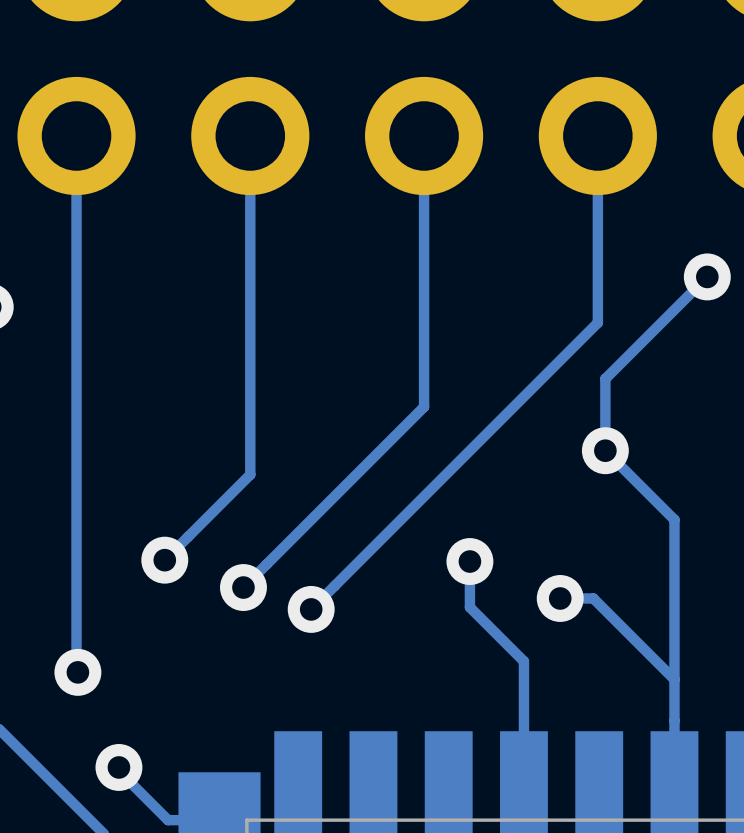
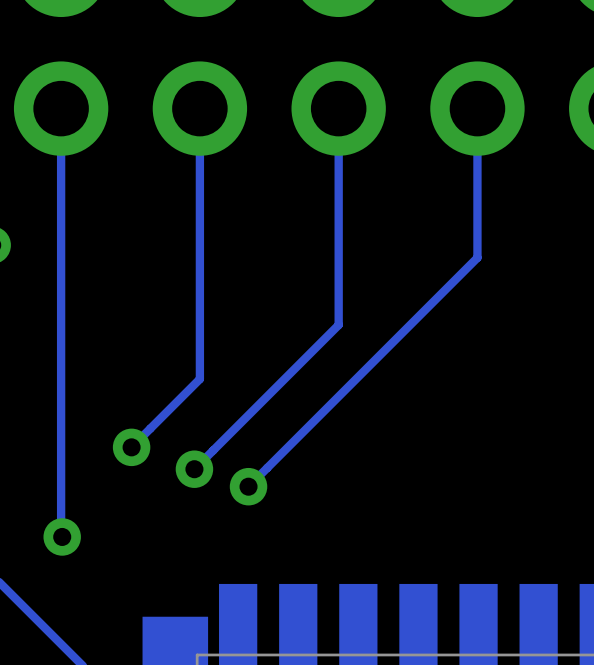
track: (707, 276) (605, 378) (605, 450) (674, 519) (674, 785) -> none
via: (707, 276) -> none
via: (605, 450) -> none
track: (469, 561) (469, 607) (523, 661) (523, 785) -> none
via: (469, 561) -> none
track: (560, 598) (593, 598) (674, 679) -> none
via: (560, 598) -> none
track: (118, 767) (118, 771) (168, 820) (219, 820) -> none
via: (118, 767) -> none

